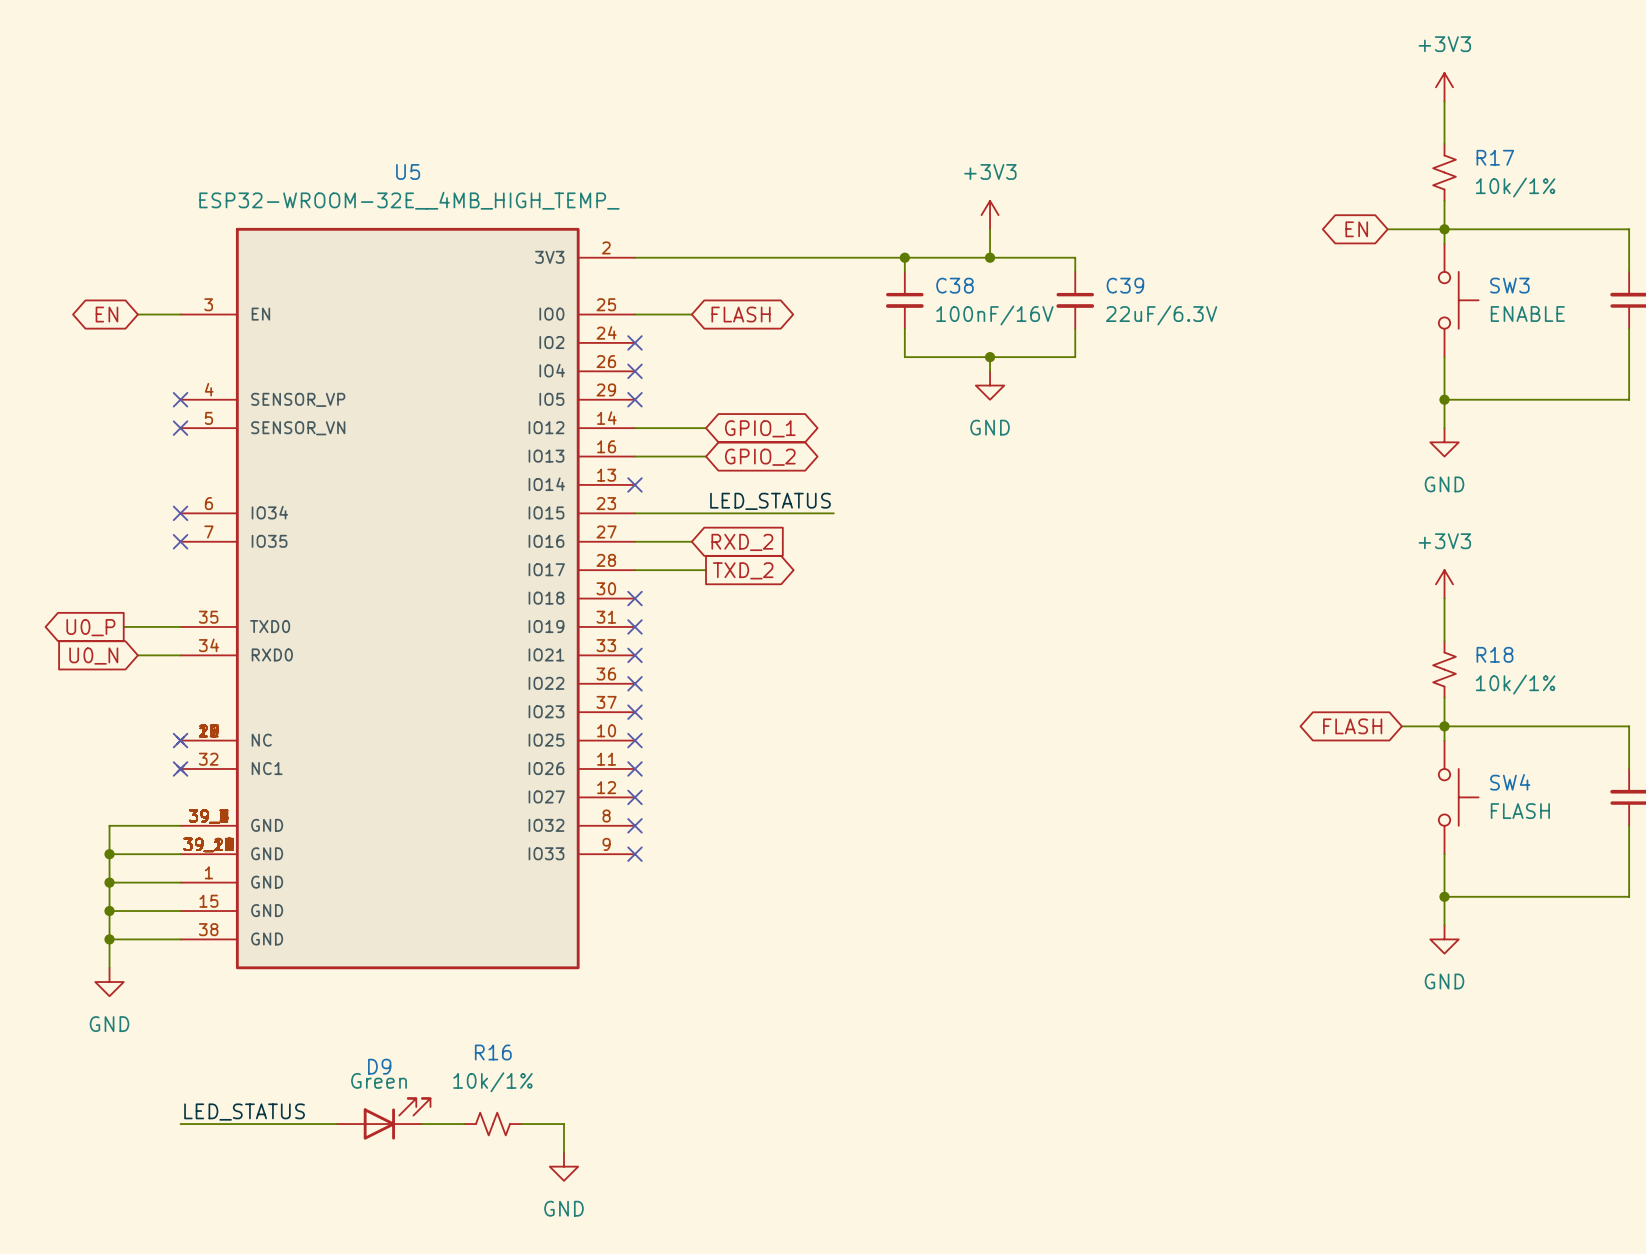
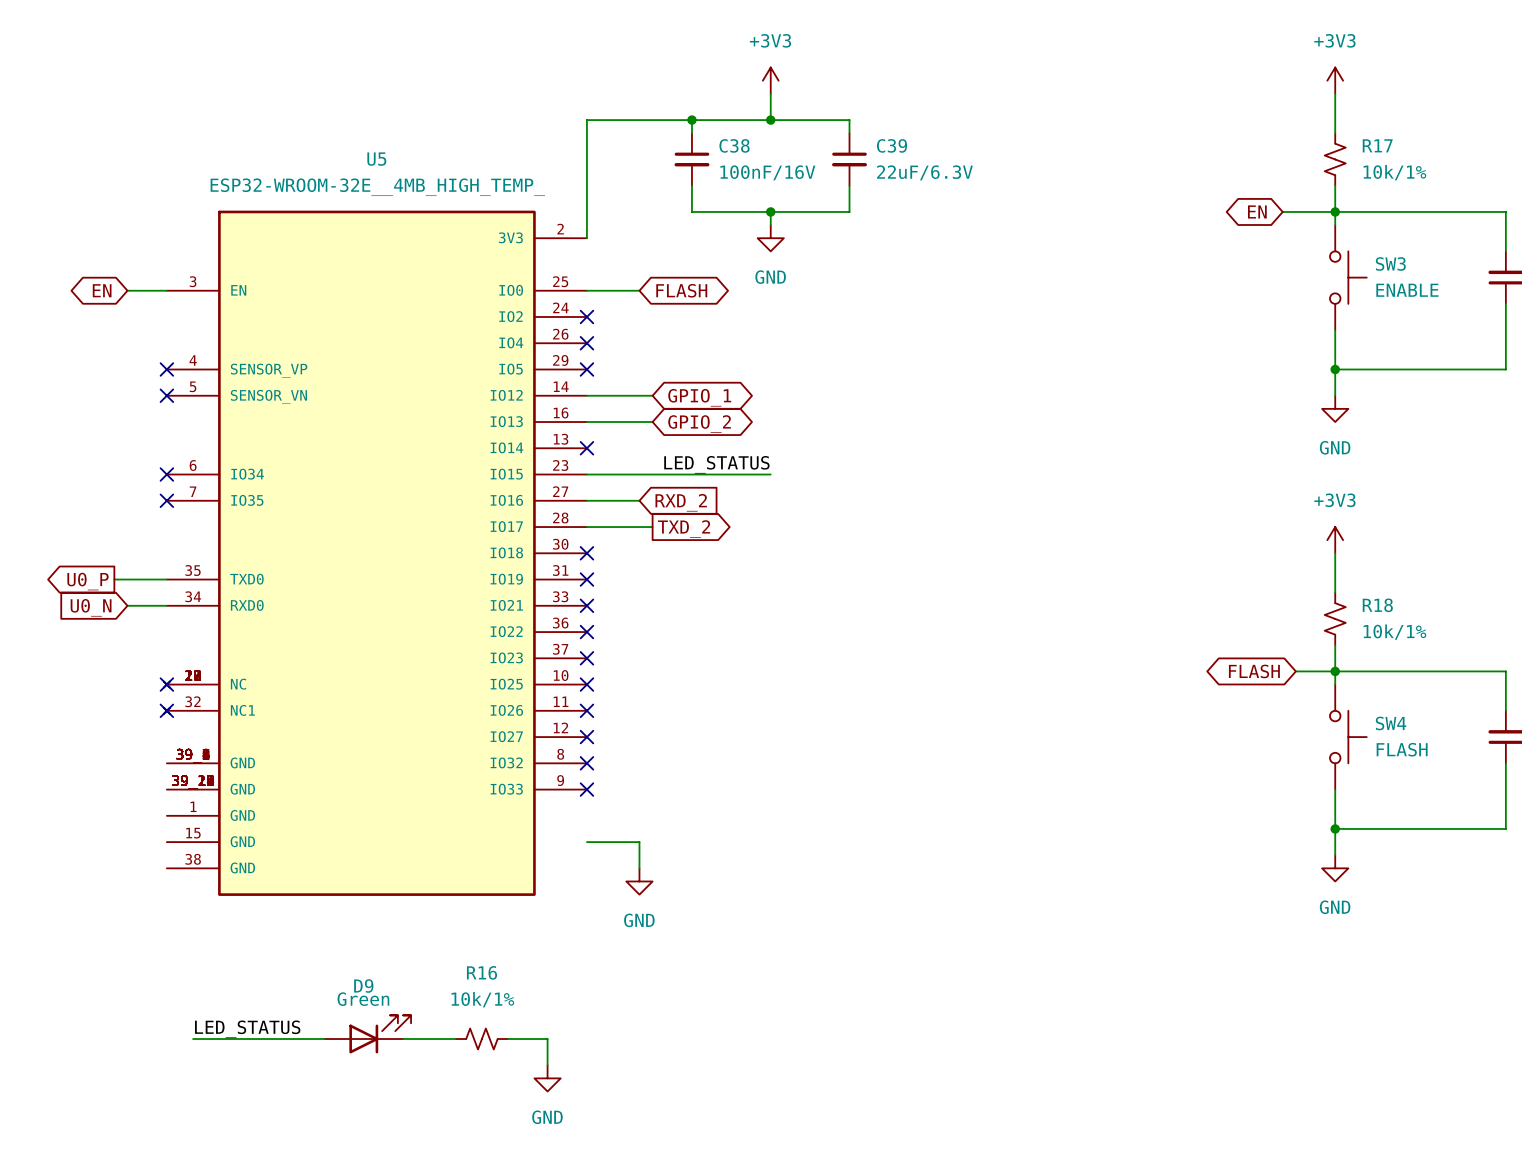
junction: none -> (691, 120)
junction: none -> (770, 120)
power symbol position: +3V3 (990, 215) -> +3V3 (770, 80)
junction: none -> (770, 211)
wire: (990, 229) (990, 257) -> (770, 93) (770, 120)
wire: (634, 257) (1075, 257) (1075, 271) -> (586, 238) (586, 120) (849, 120) (849, 133)
wire: (904, 257) (904, 271) -> (691, 120) (691, 133)
junction: (904, 257) -> none
junction: (990, 257) -> none
C38 position: (904, 300) -> (691, 159)
C39 position: (1075, 300) -> (849, 159)
wire: (904, 328) (904, 357) (1075, 357) (1075, 328) -> (691, 185) (691, 211) (849, 211) (849, 185)
wire: (990, 357) (990, 371) -> (770, 211) (770, 225)
junction: (990, 357) -> none
power symbol position: GND (990, 385) -> GND (770, 238)
wire: (180, 825) (109, 825) (109, 967) -> none
wire: (109, 854) (180, 854) -> none
junction: (109, 854) -> none
wire: (109, 882) (180, 882) -> none
junction: (109, 882) -> none
wire: (109, 911) (180, 911) -> none
junction: (109, 911) -> none
wire: none -> (586, 842) (639, 842) (639, 868)
wire: (109, 939) (180, 939) -> none
junction: (109, 939) -> none
power symbol: none -> GND (639, 881)
power symbol: GND (109, 982) -> none
label position: LED_STATUS (244, 1112) -> LED_STATUS (247, 1029)
D9 position: (383, 1119) -> (367, 1034)
wire: (180, 1124) (208, 1124) -> none
R16 position: (492, 1124) -> (481, 1039)
wire: (563, 1124) (563, 1152) -> (521, 1039) (547, 1039) (547, 1065)
power symbol position: GND (563, 1166) -> GND (547, 1078)

